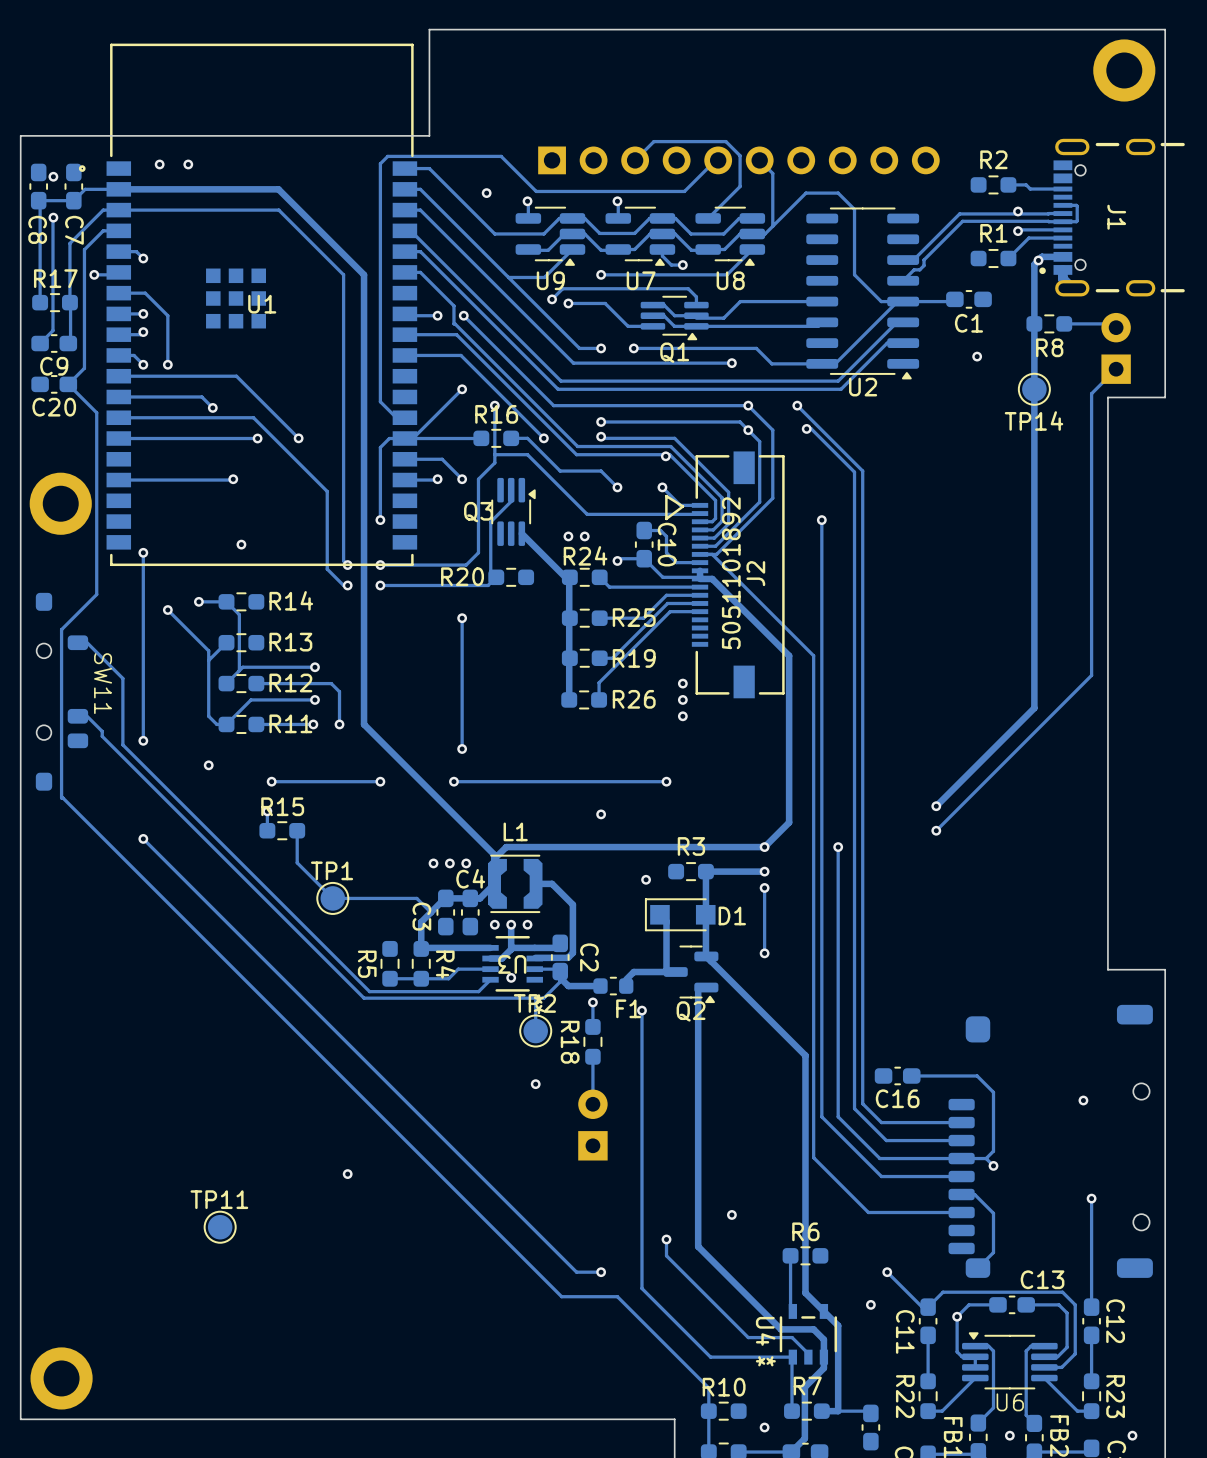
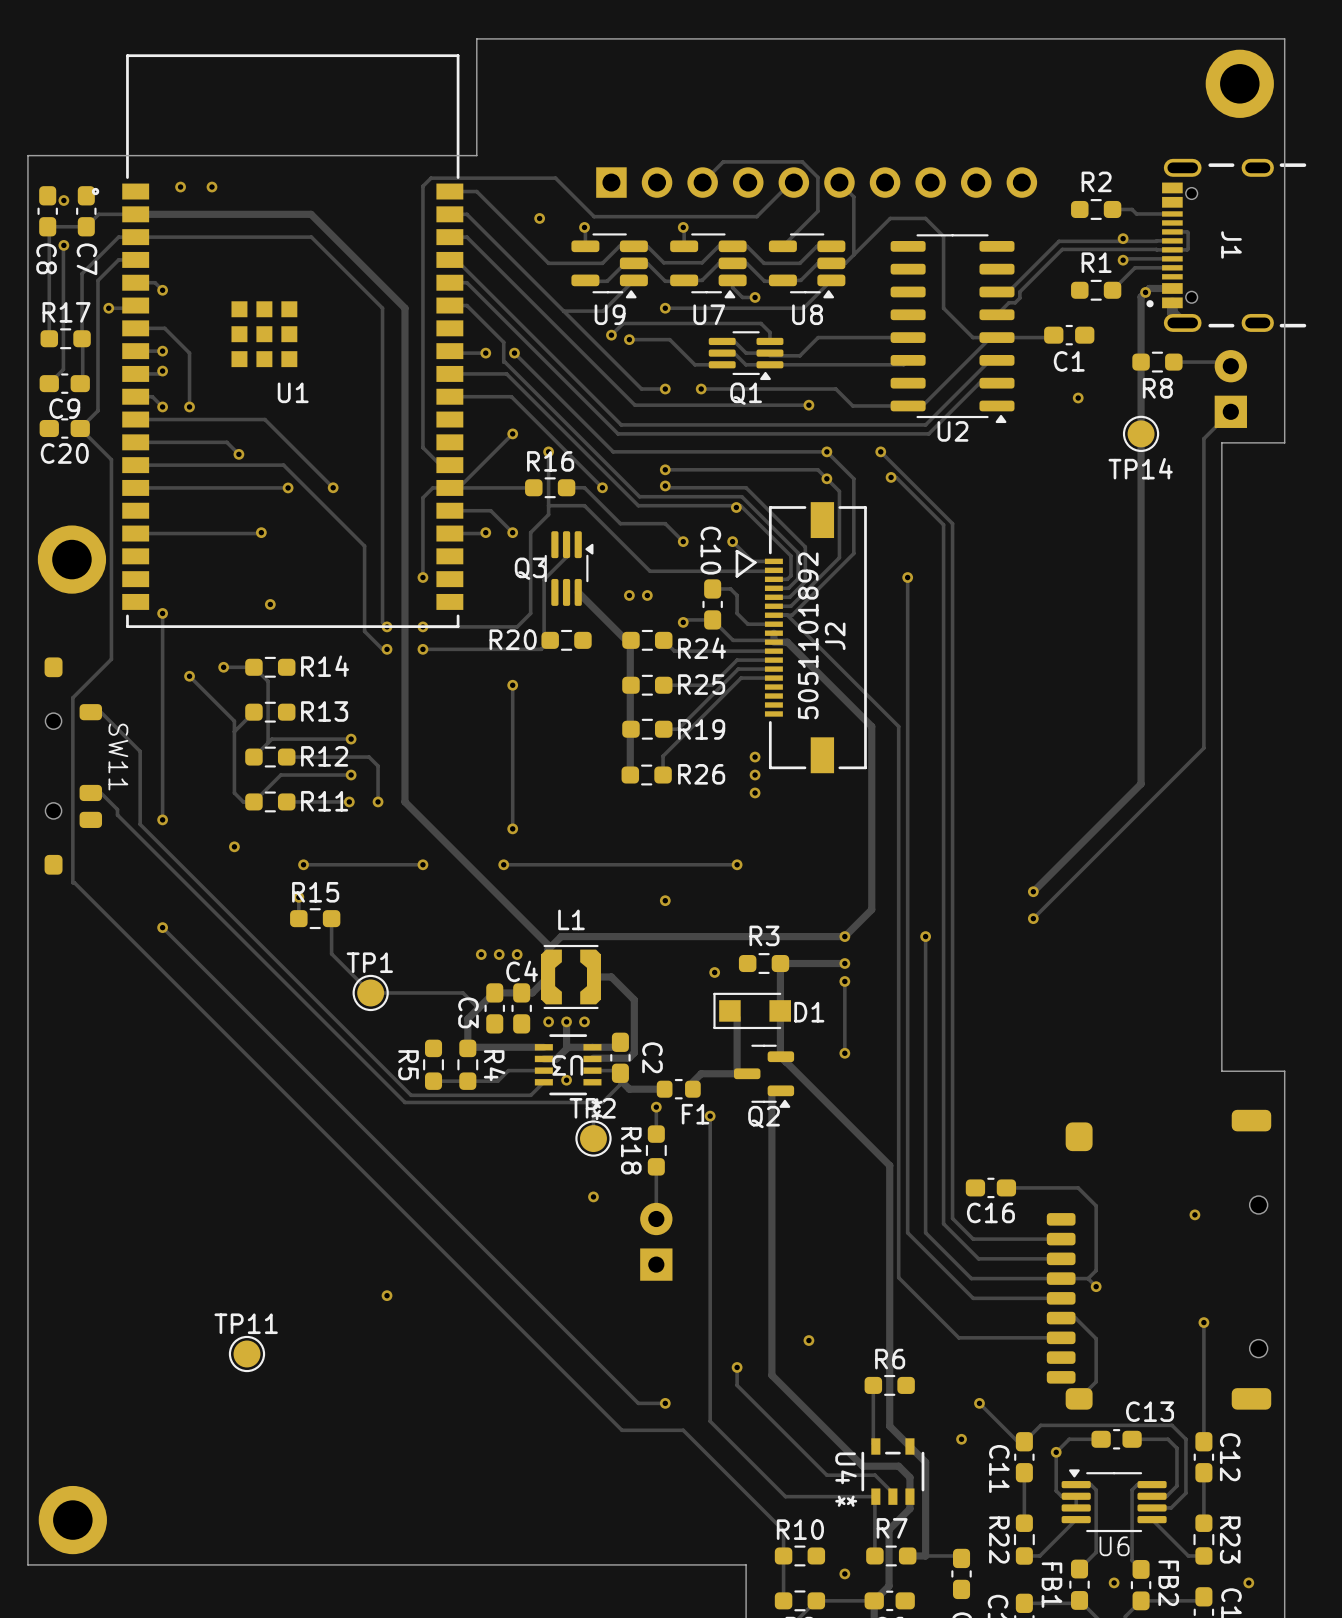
U1 name position: U1 (262, 304) -> U1 (293, 392)
C10 name position: C10 (667, 544) -> C10 (710, 550)
R24 name position: R24 (585, 555) -> R24 (702, 648)

